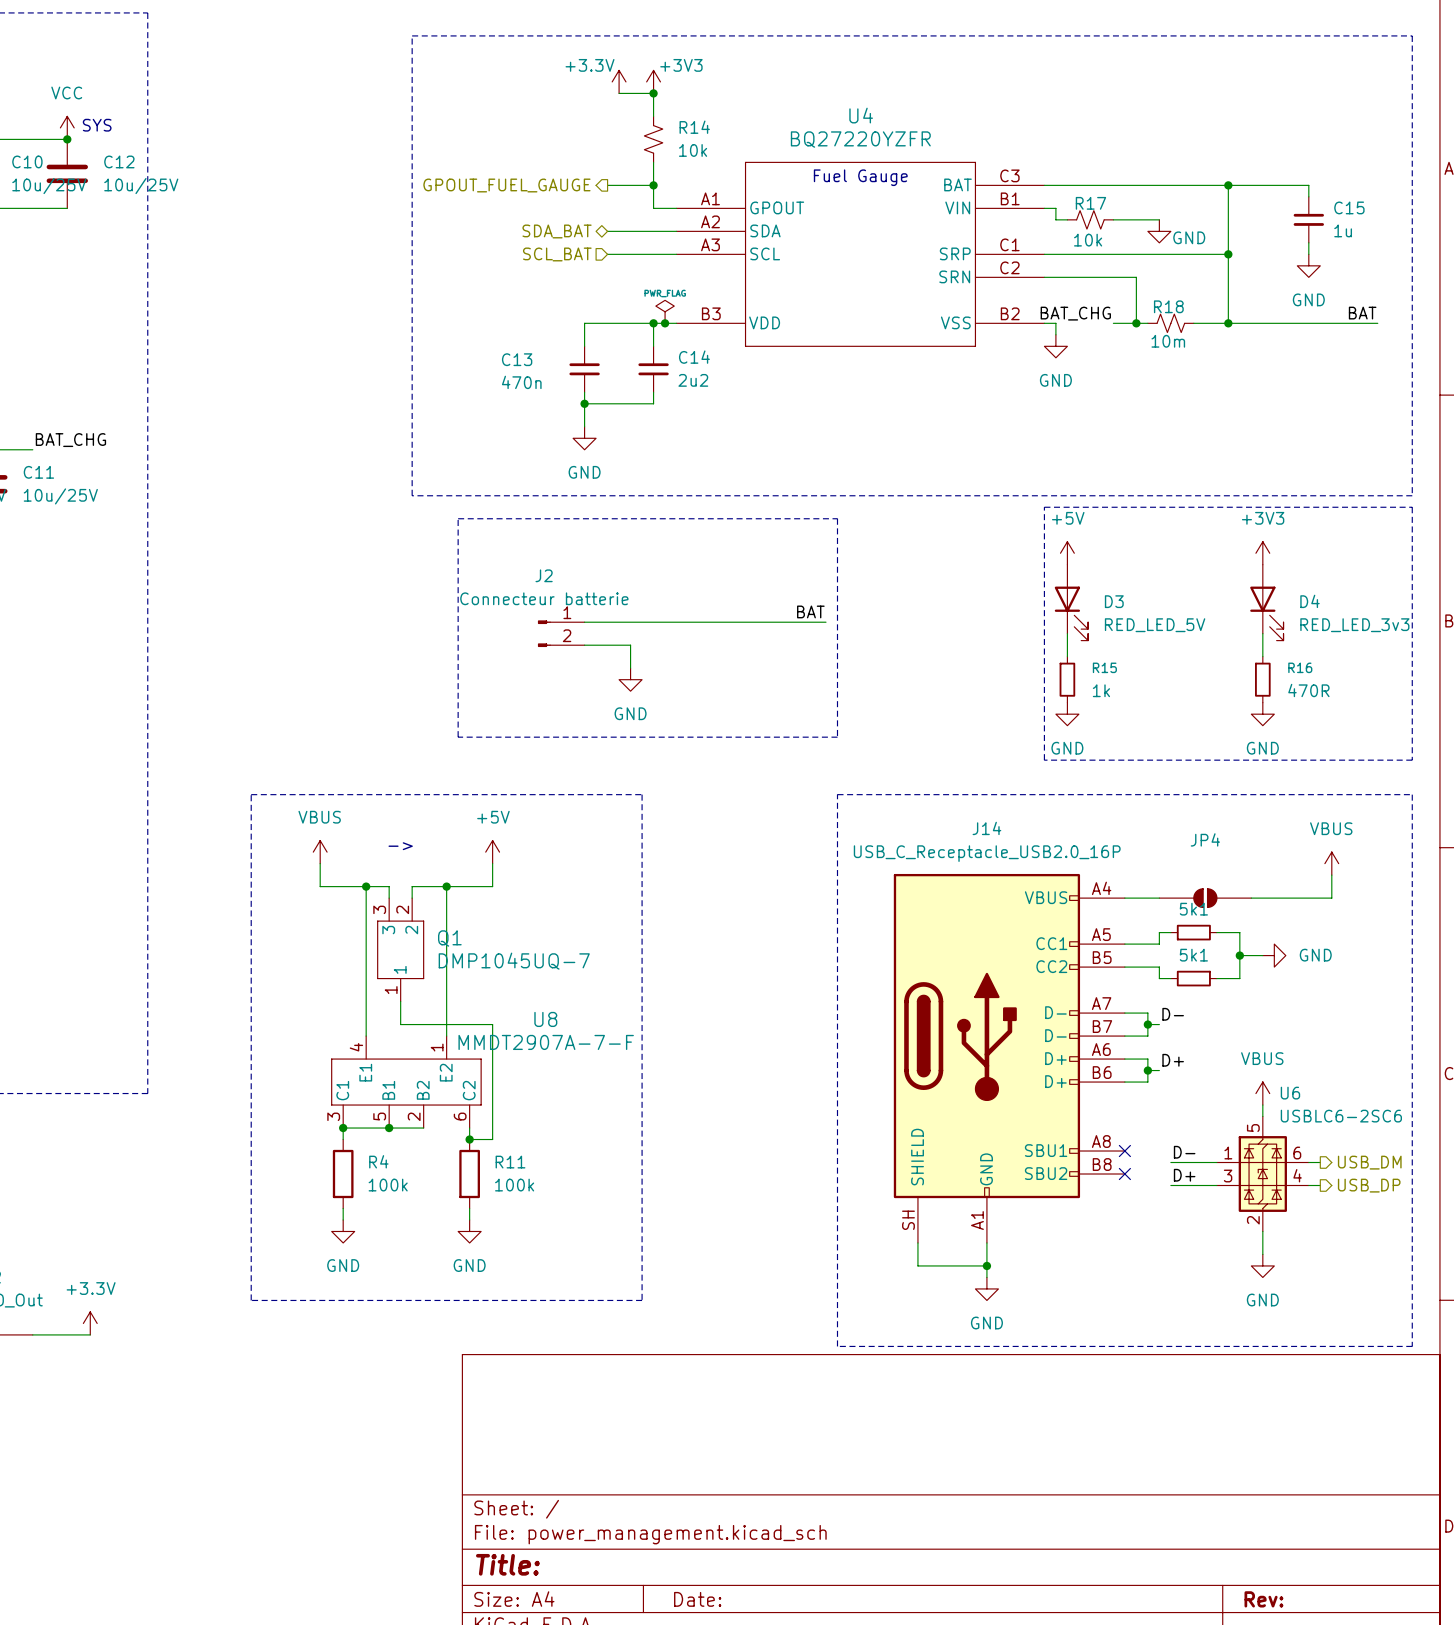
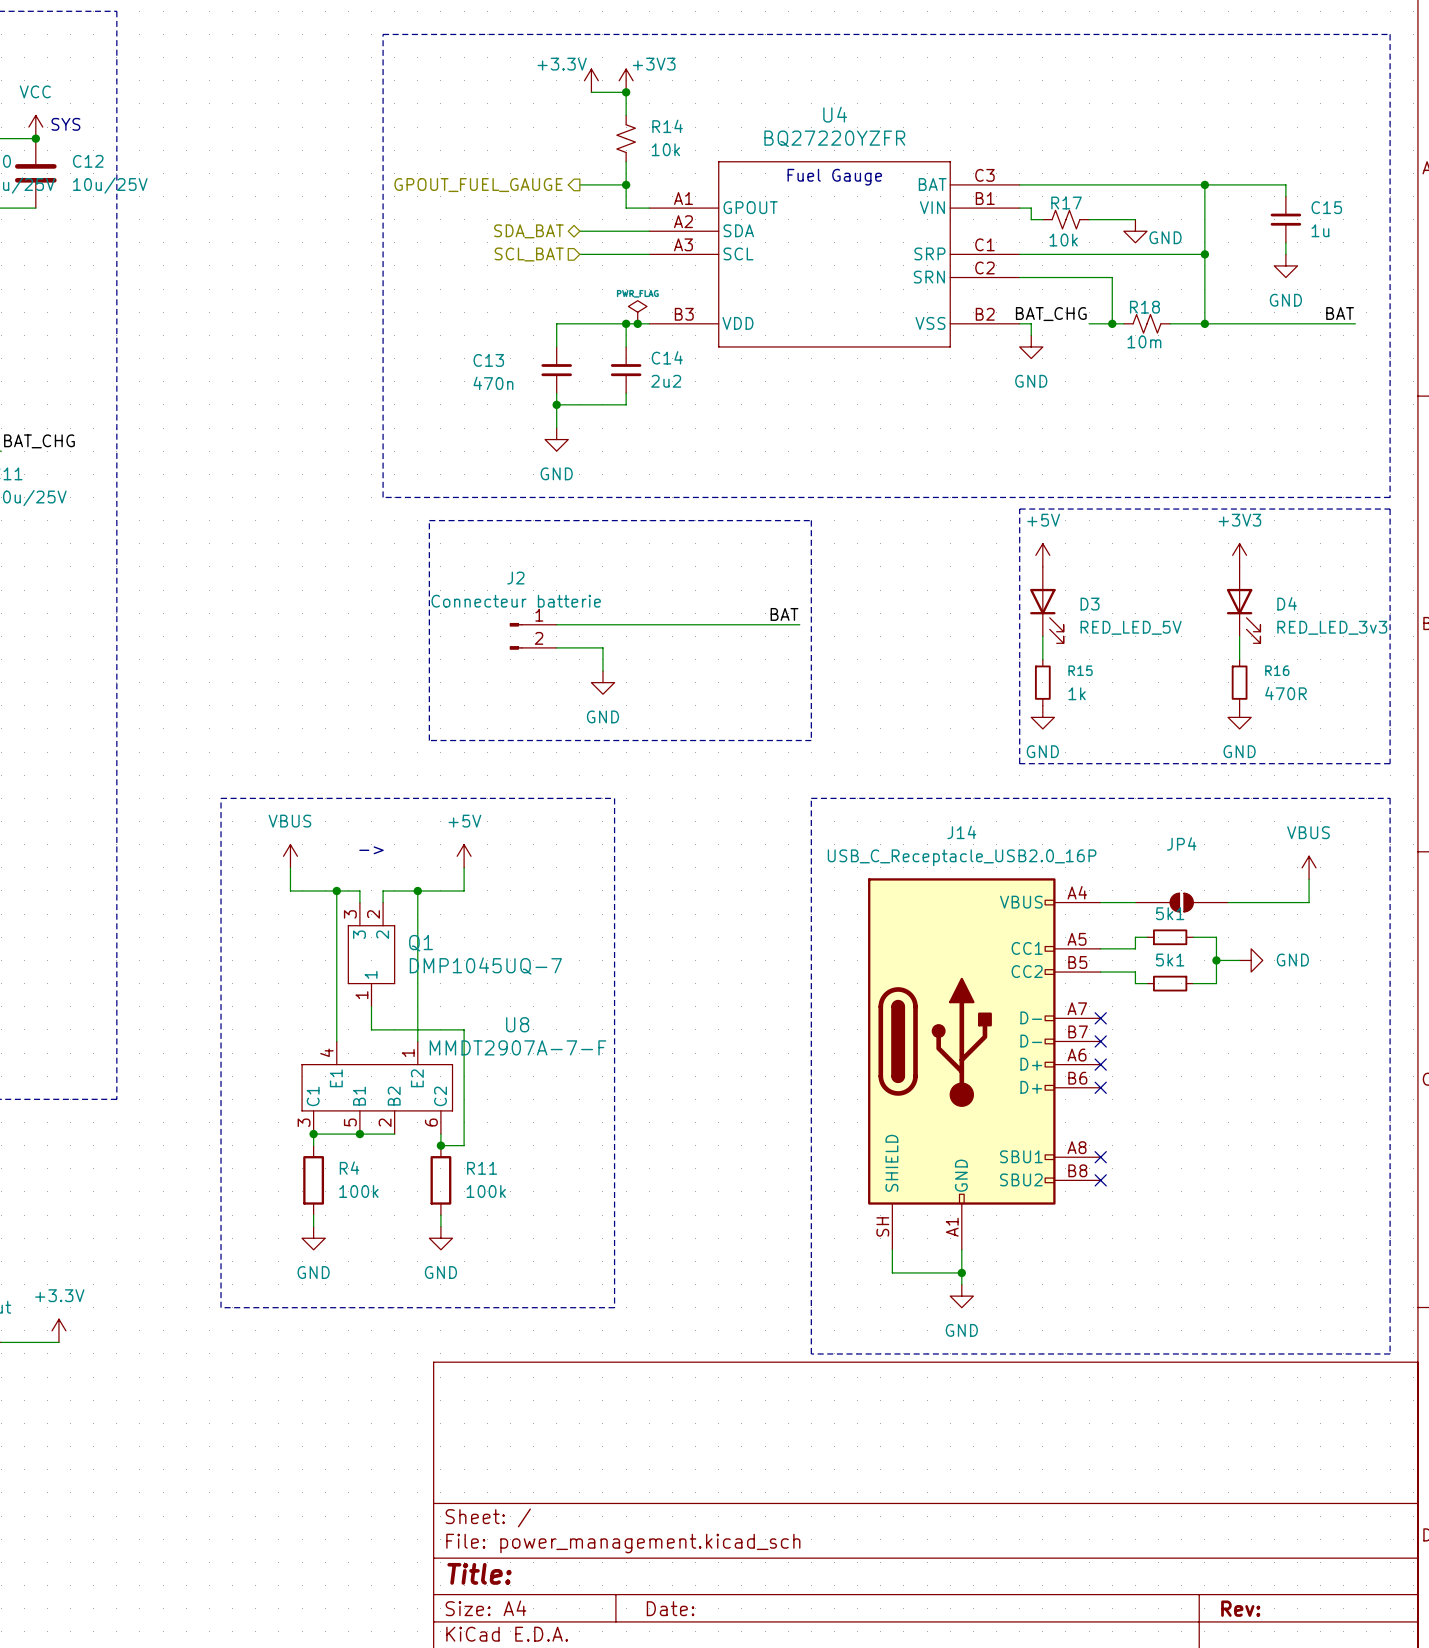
wire: (1124, 1013) (1147, 1013) (1147, 1036) (1124, 1036) -> none
no-connect mark: none -> (1100, 1018)
label: D- (1173, 1014) -> none
wire: (1147, 1024) (1159, 1024) -> none
junction: (1147, 1024) -> none
no-connect mark: none -> (1100, 1041)
wire: (1124, 1059) (1147, 1059) (1147, 1082) (1124, 1082) -> none
no-connect mark: none -> (1100, 1064)
label: D+ (1173, 1060) -> none
wire: (1147, 1070) (1159, 1070) -> none
junction: (1147, 1070) -> none
no-connect mark: none -> (1100, 1087)
power symbol: VBUS (1262, 1093) -> none
wire: (1262, 1105) (1262, 1116) -> none
label: D- (1184, 1152) -> none
wire: (1170, 1162) (1216, 1162) -> none
wire: (1308, 1162) (1320, 1162) -> none
hierarchical label: USB_DM (1369, 1162) -> none
U6: USBLC6-2SC6 (1262, 1174) -> none
label: D+ (1184, 1175) -> none
wire: (1170, 1185) (1216, 1185) -> none
wire: (1308, 1185) (1320, 1185) -> none
hierarchical label: USB_DP (1369, 1185) -> none
wire: (1262, 1231) (1262, 1254) -> none
power symbol: GND (1262, 1265) -> none

